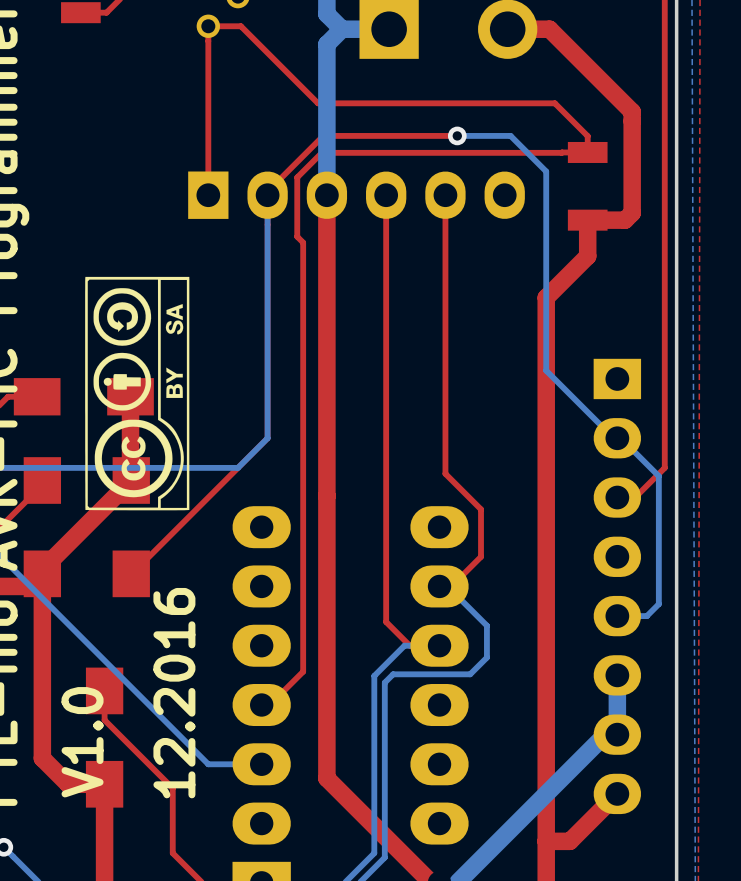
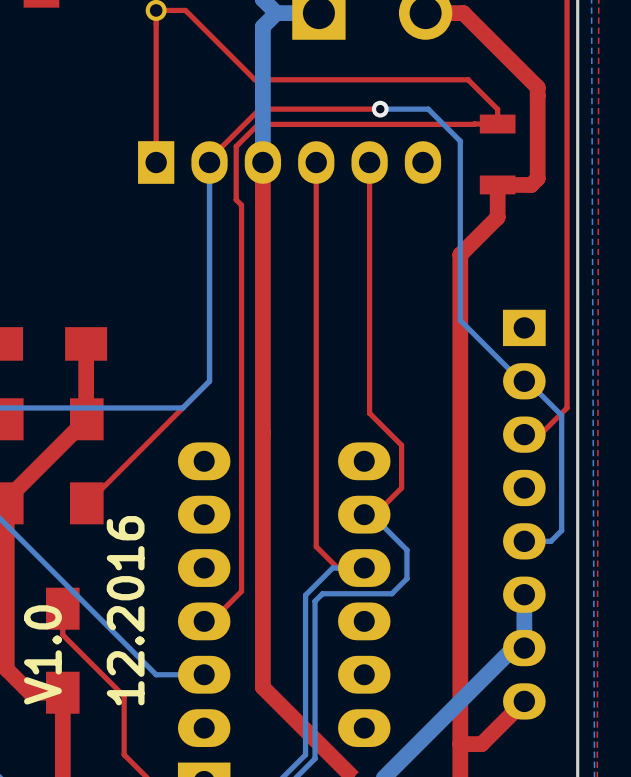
drawing: [85, 276, 190, 511] -> none

